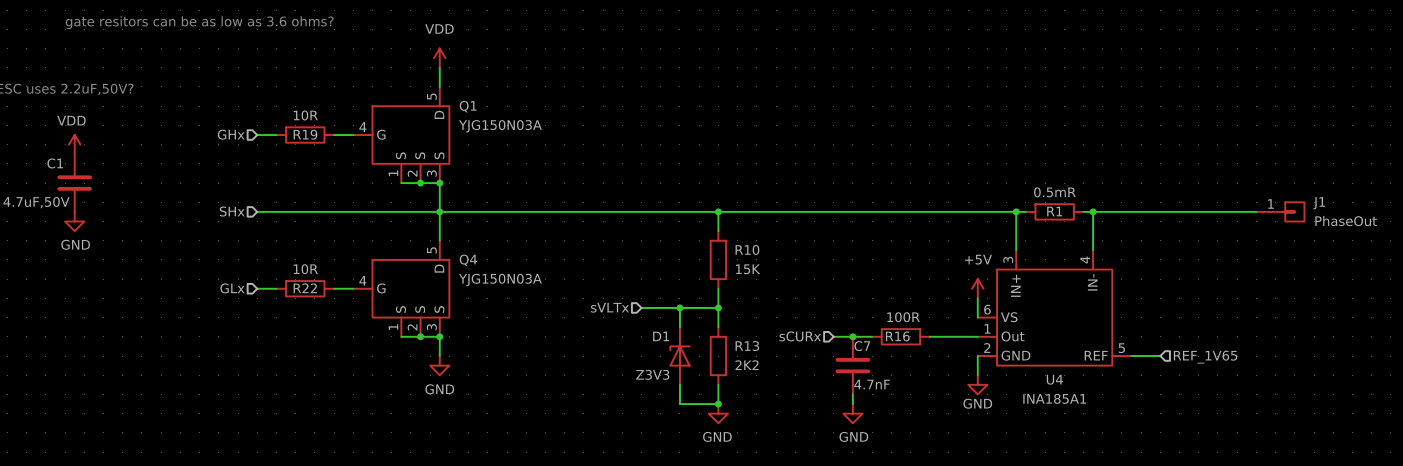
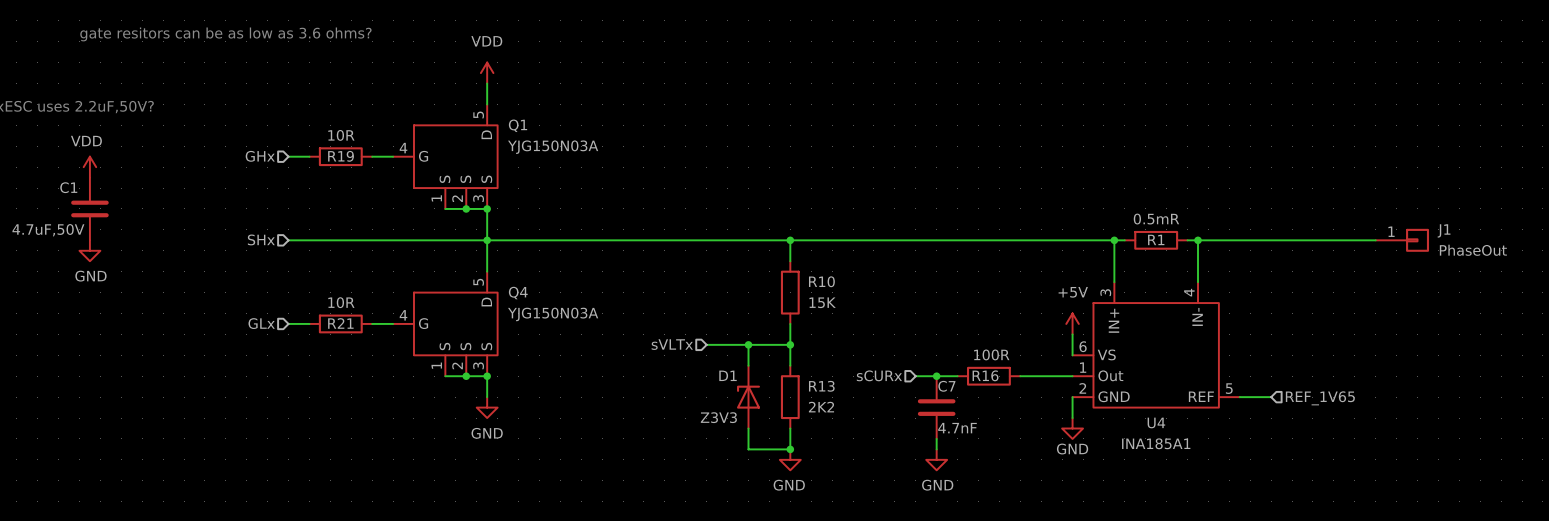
R22 name: R22 (305, 288) -> R21 (340, 323)

